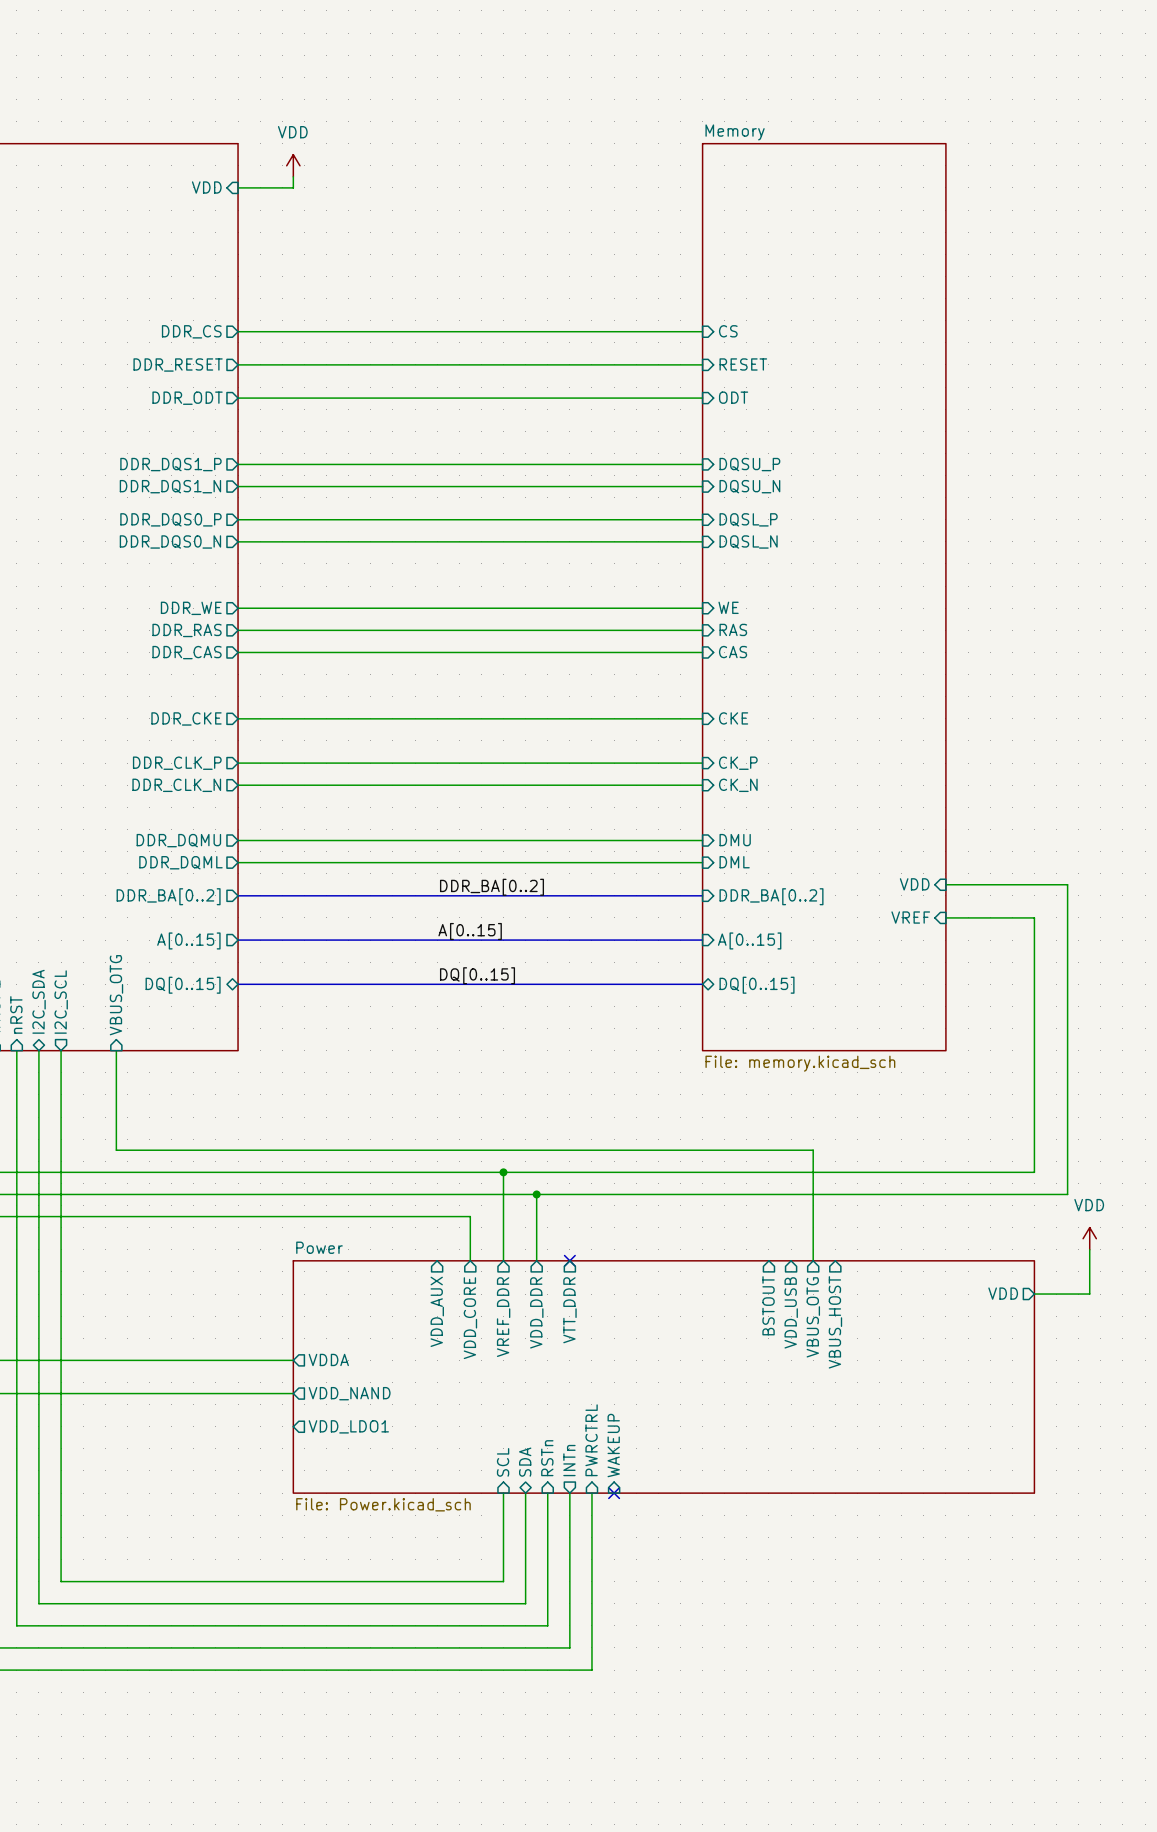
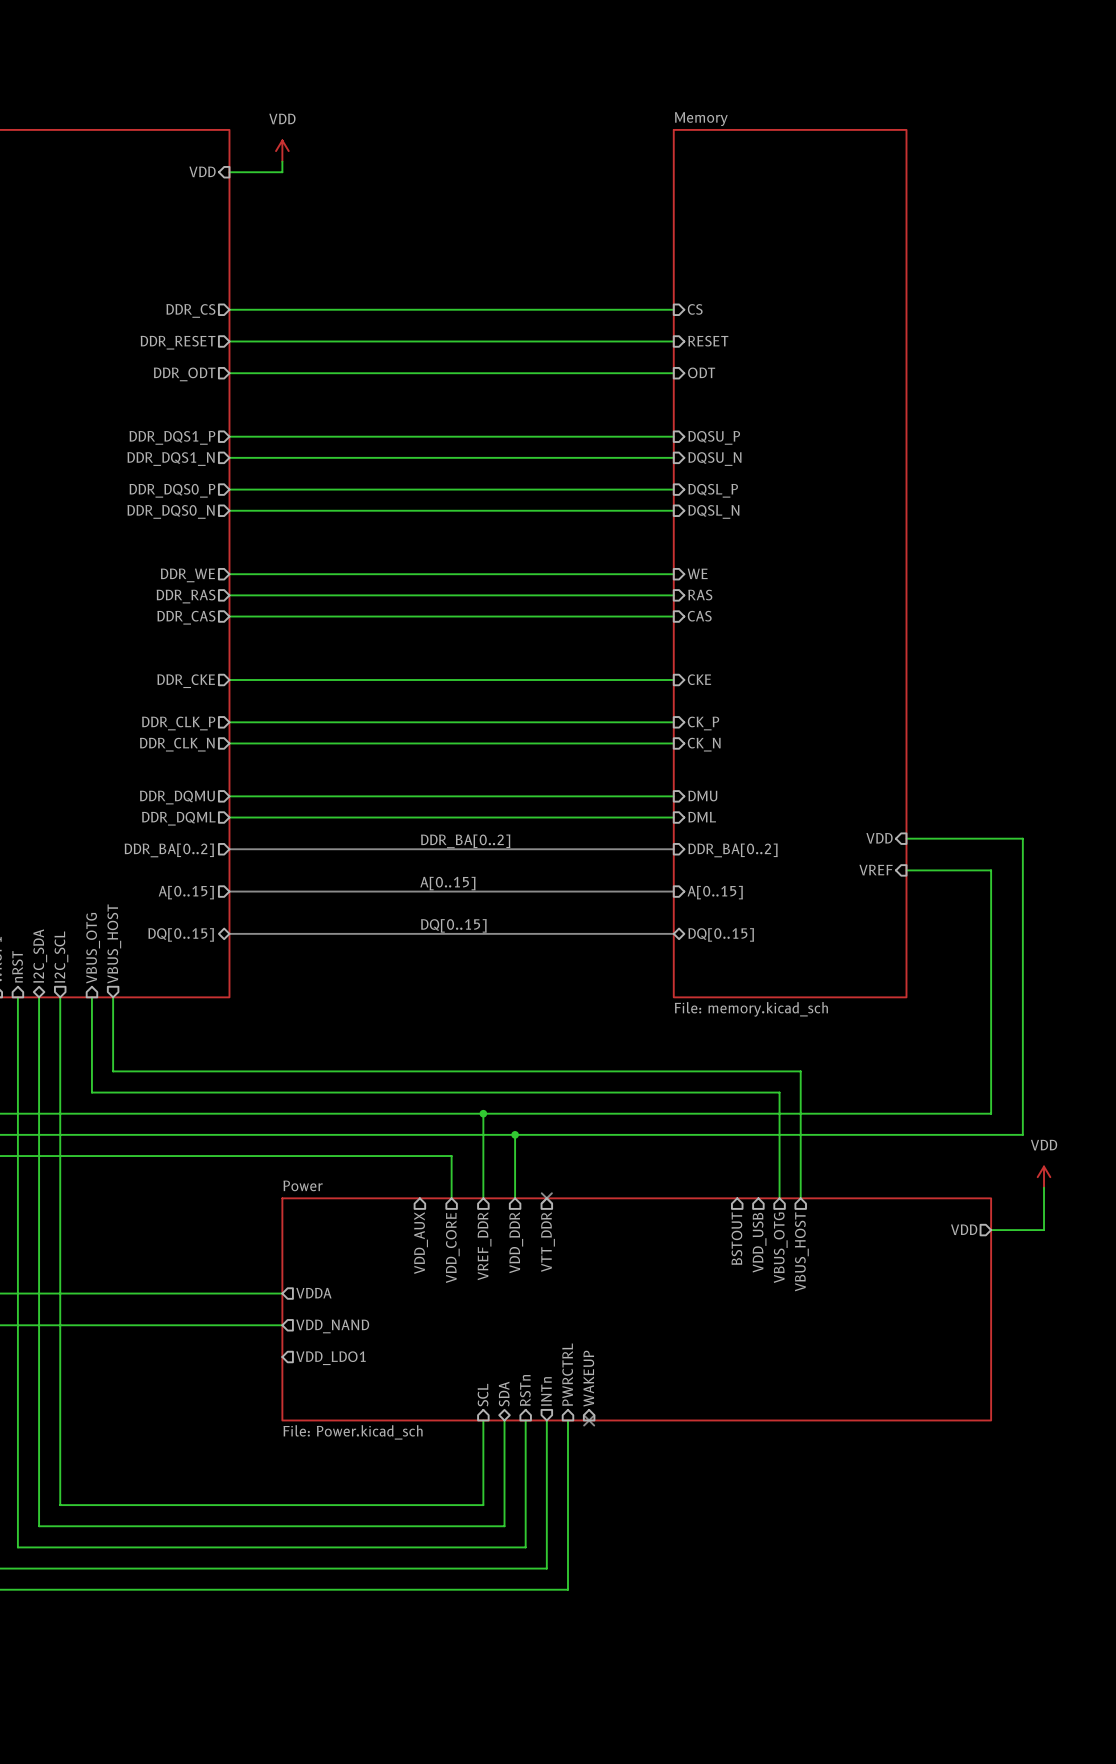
sheet pin: none -> VBUS_OTG (93, 948)
sheet pin shape: input (116, 995) -> output (114, 943)
sheet pin: VBUS_OTG (116, 995) -> VBUS_HOST (114, 943)
wire: (116, 1128) (116, 1150) -> (91, 997) (91, 1092) (113, 1092)
wire: none -> (113, 1071) (800, 1071) (800, 1198)

